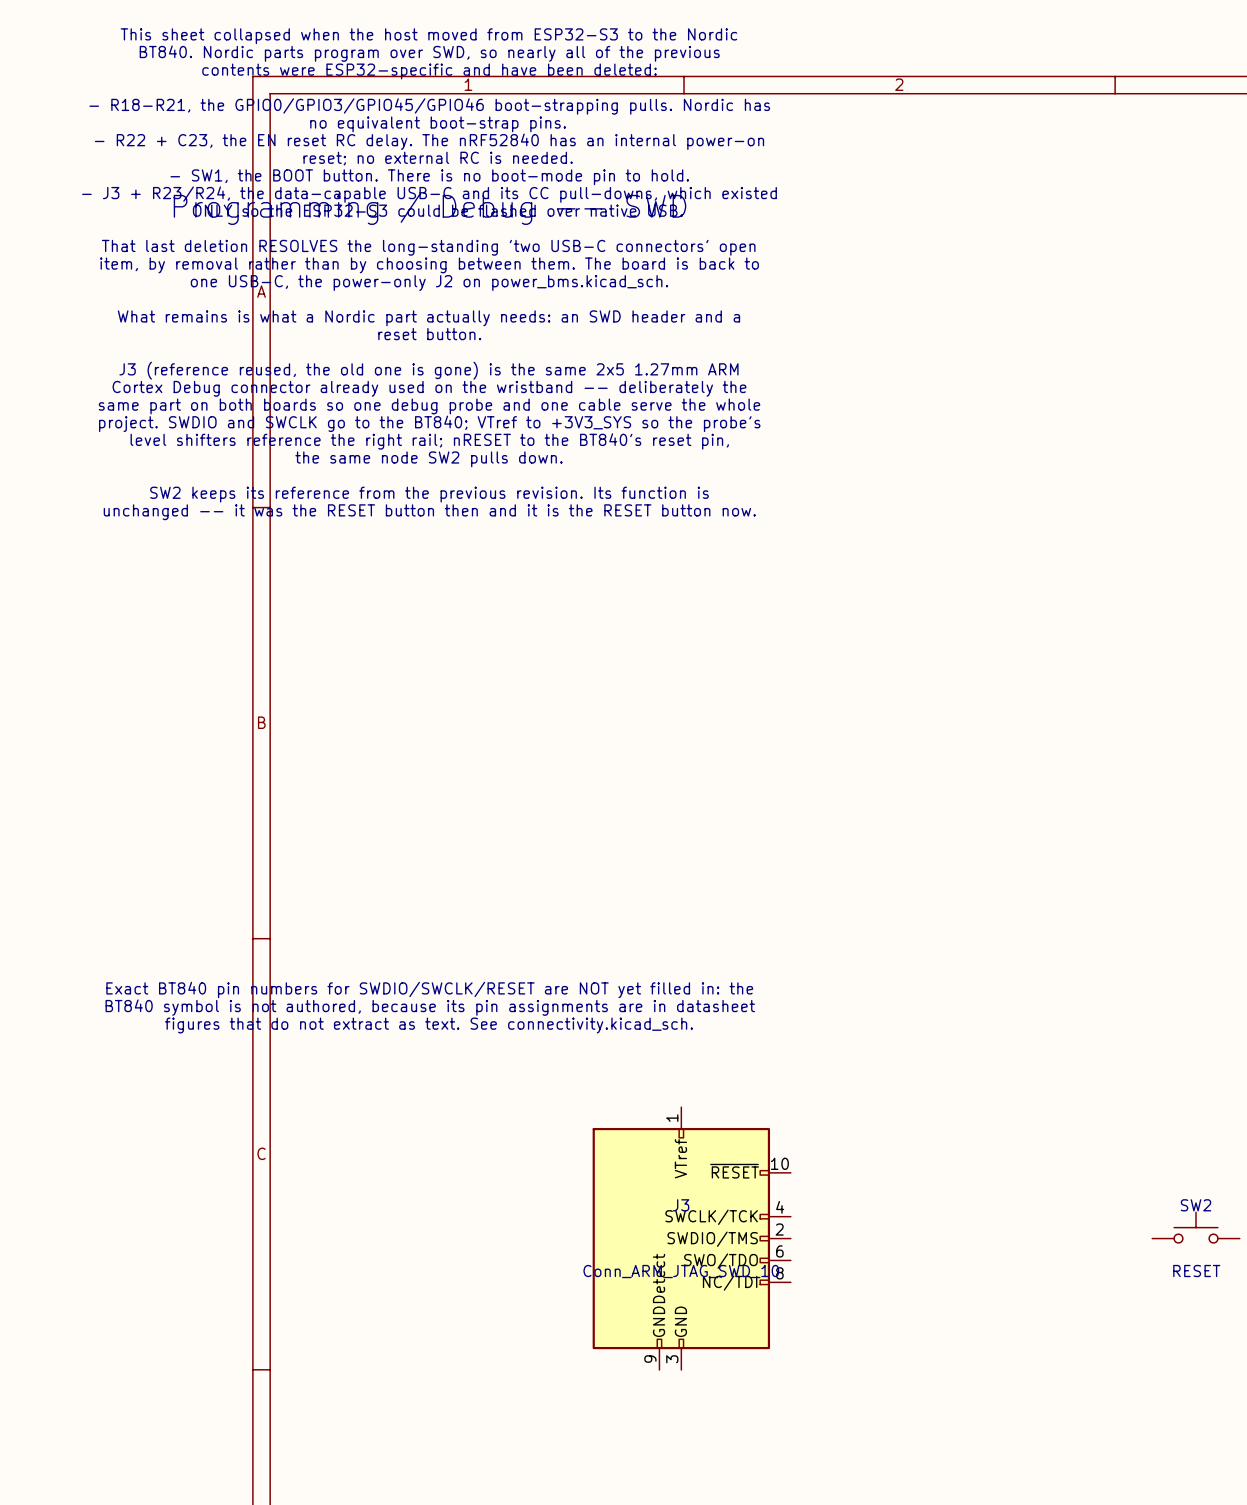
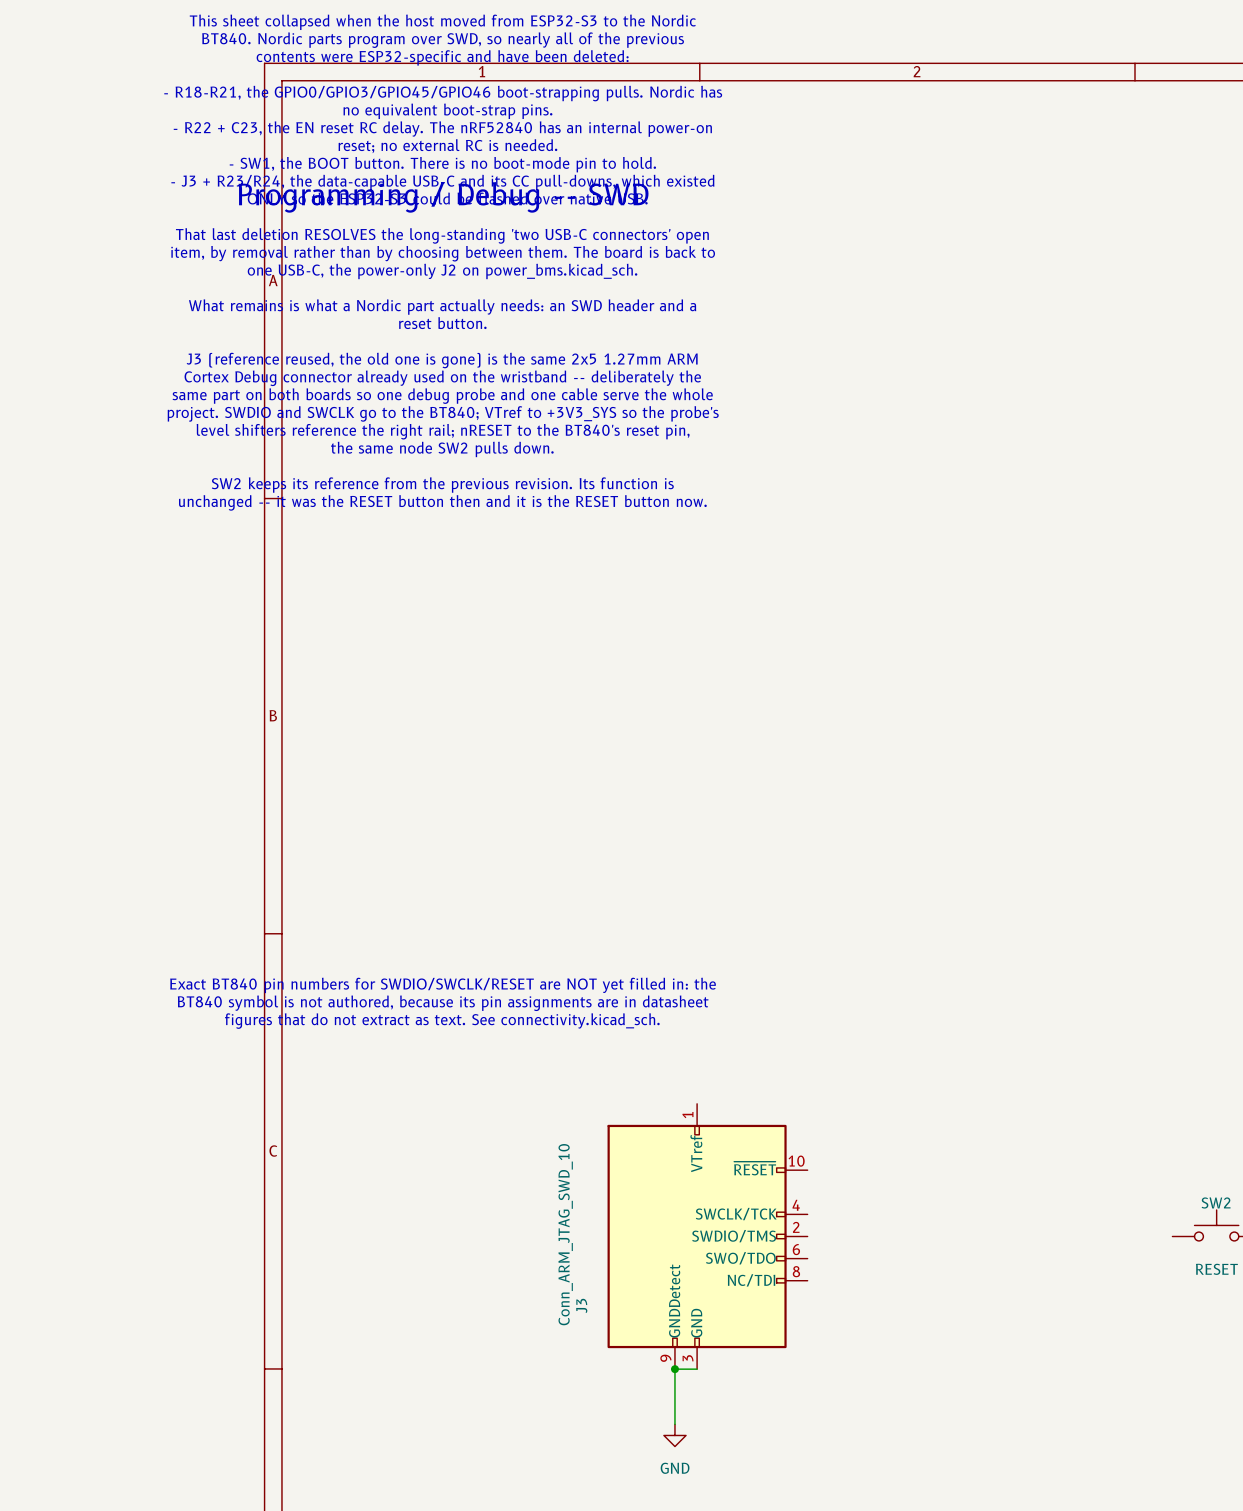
J3 name rotation: 0° (681, 1205) -> 90° counterclockwise (581, 1305)
J3 name position: J3 (681, 1205) -> J3 (581, 1305)
J3 value rotation: 0° (681, 1271) -> 90° counterclockwise (565, 1234)
junction: none -> (674, 1369)
wire: none -> (697, 1369) (674, 1369) (674, 1424)
power symbol: none -> GND (674, 1435)

